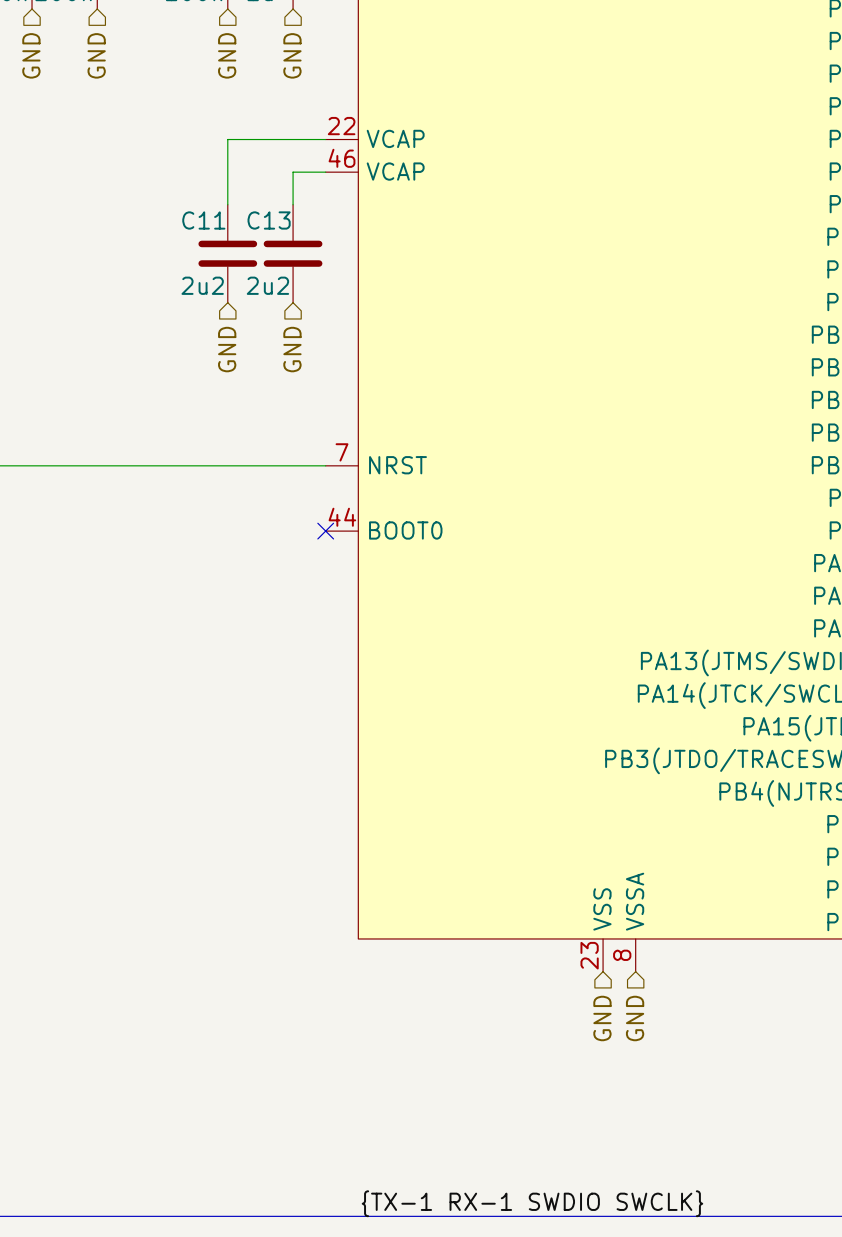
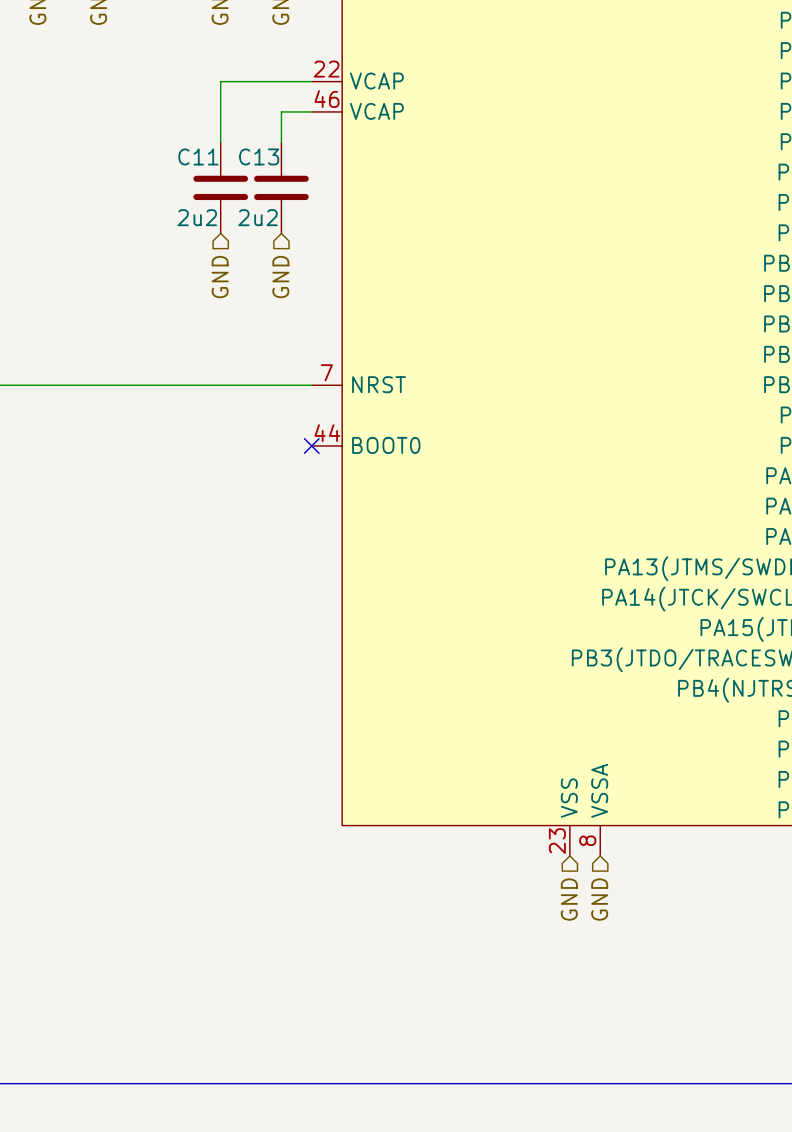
label: {TX-1 RX-1 SWDIO SWCLK} (532, 1203) -> none

